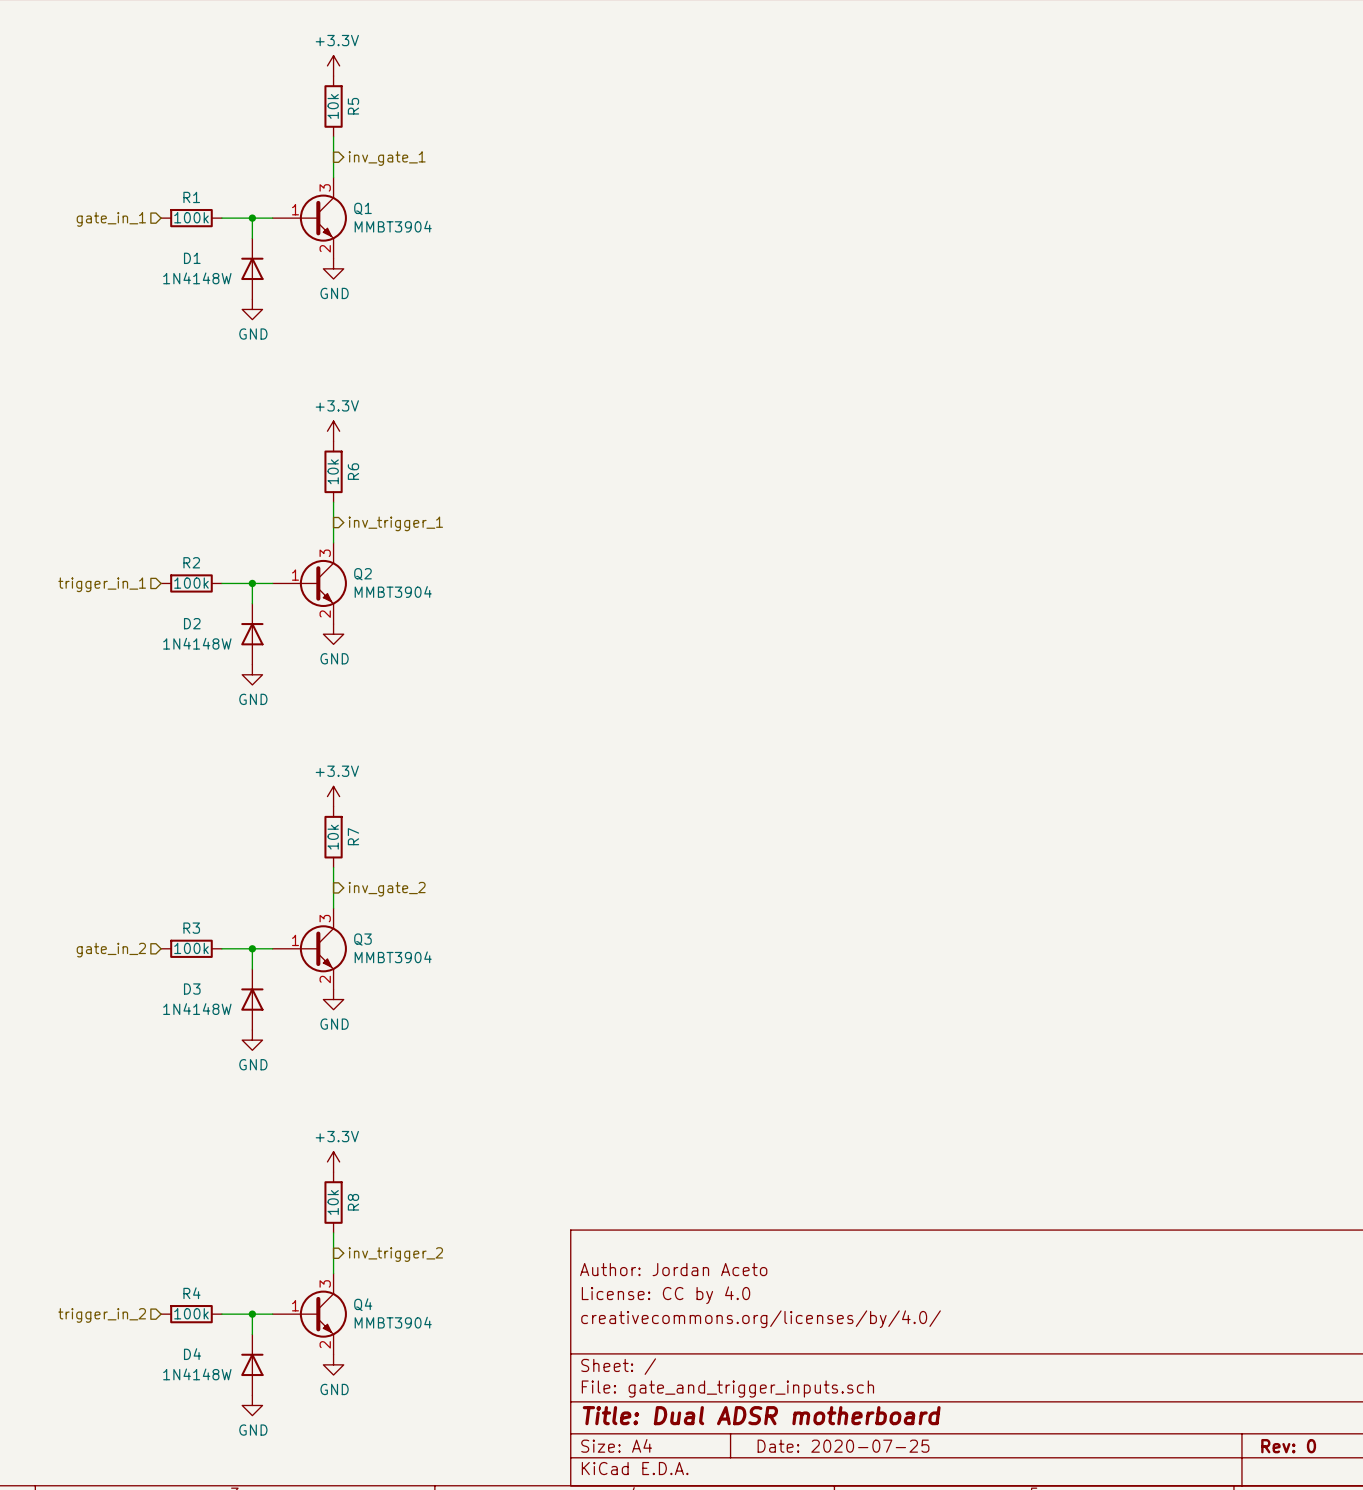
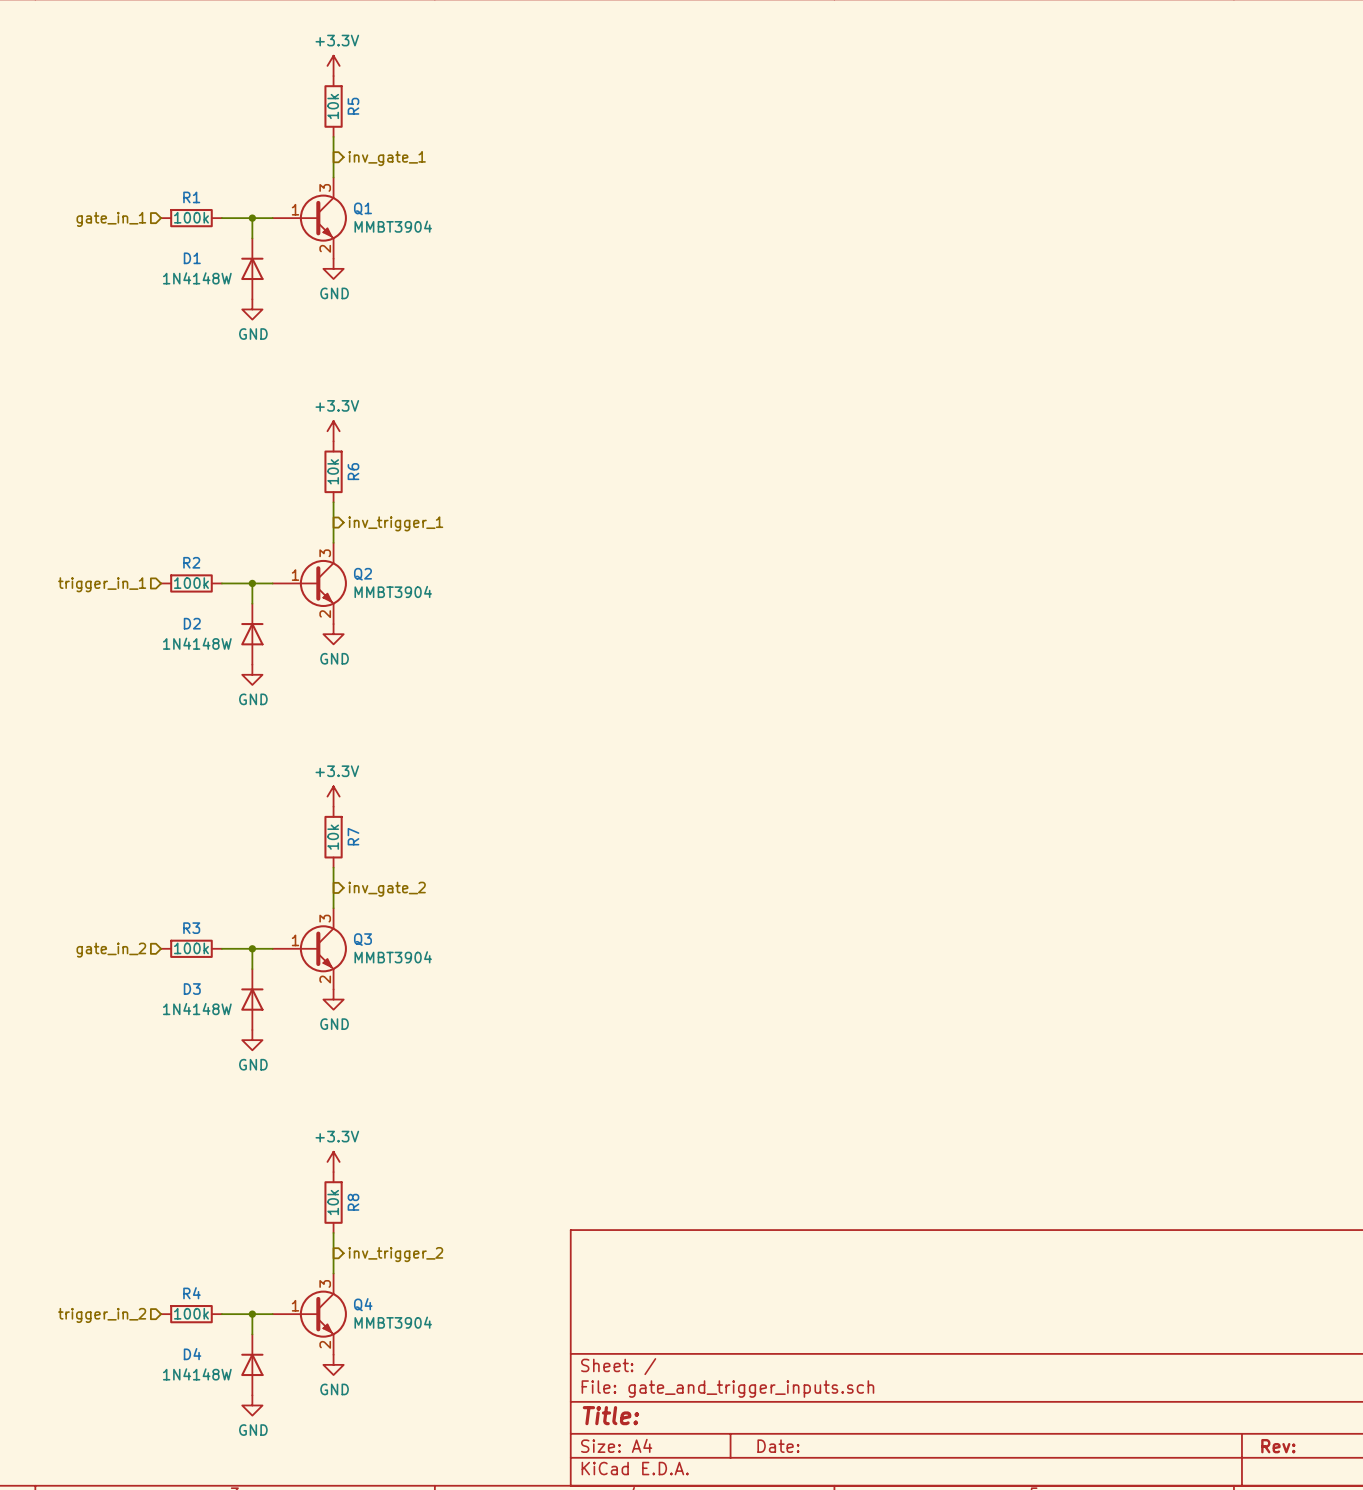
title block: Author: Jordan Aceto (673, 1269) -> none
title block: License: CC by 4.0 (666, 1295) -> none
title block: creativecommons.org/licenses/by/4.0/ (761, 1319) -> none
title block: Title: Dual ADSR motherboard (761, 1415) -> Title: (610, 1415)
title block: Date: 2020-07-25 (843, 1446) -> Date: (778, 1446)
title block: Rev: 0 (1288, 1446) -> Rev: (1278, 1446)

